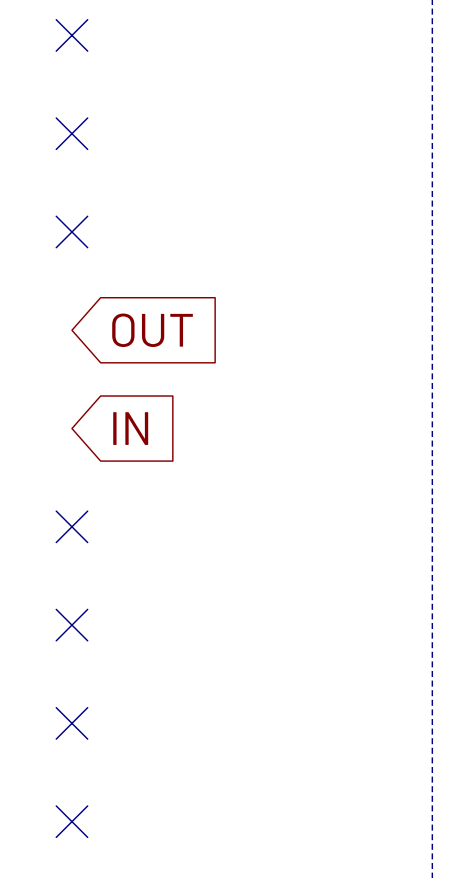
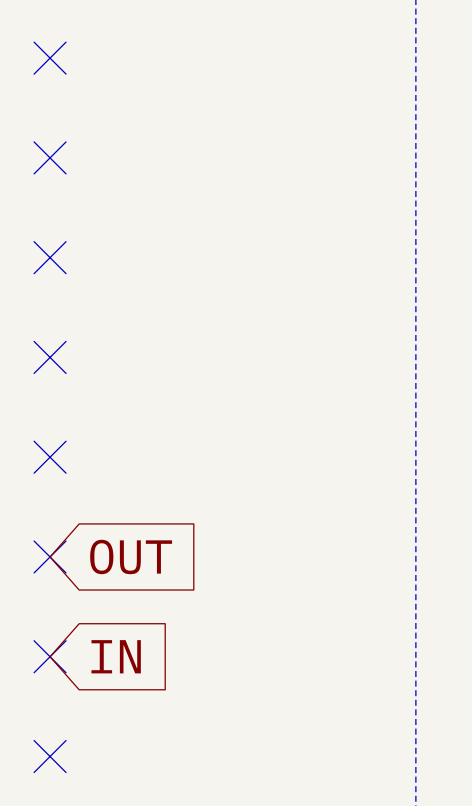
no-connect mark: none -> (50, 257)
global label position: OUT (152, 330) -> OUT (131, 556)
no-connect mark: none -> (50, 357)
global label position: IN (130, 428) -> IN (116, 656)

